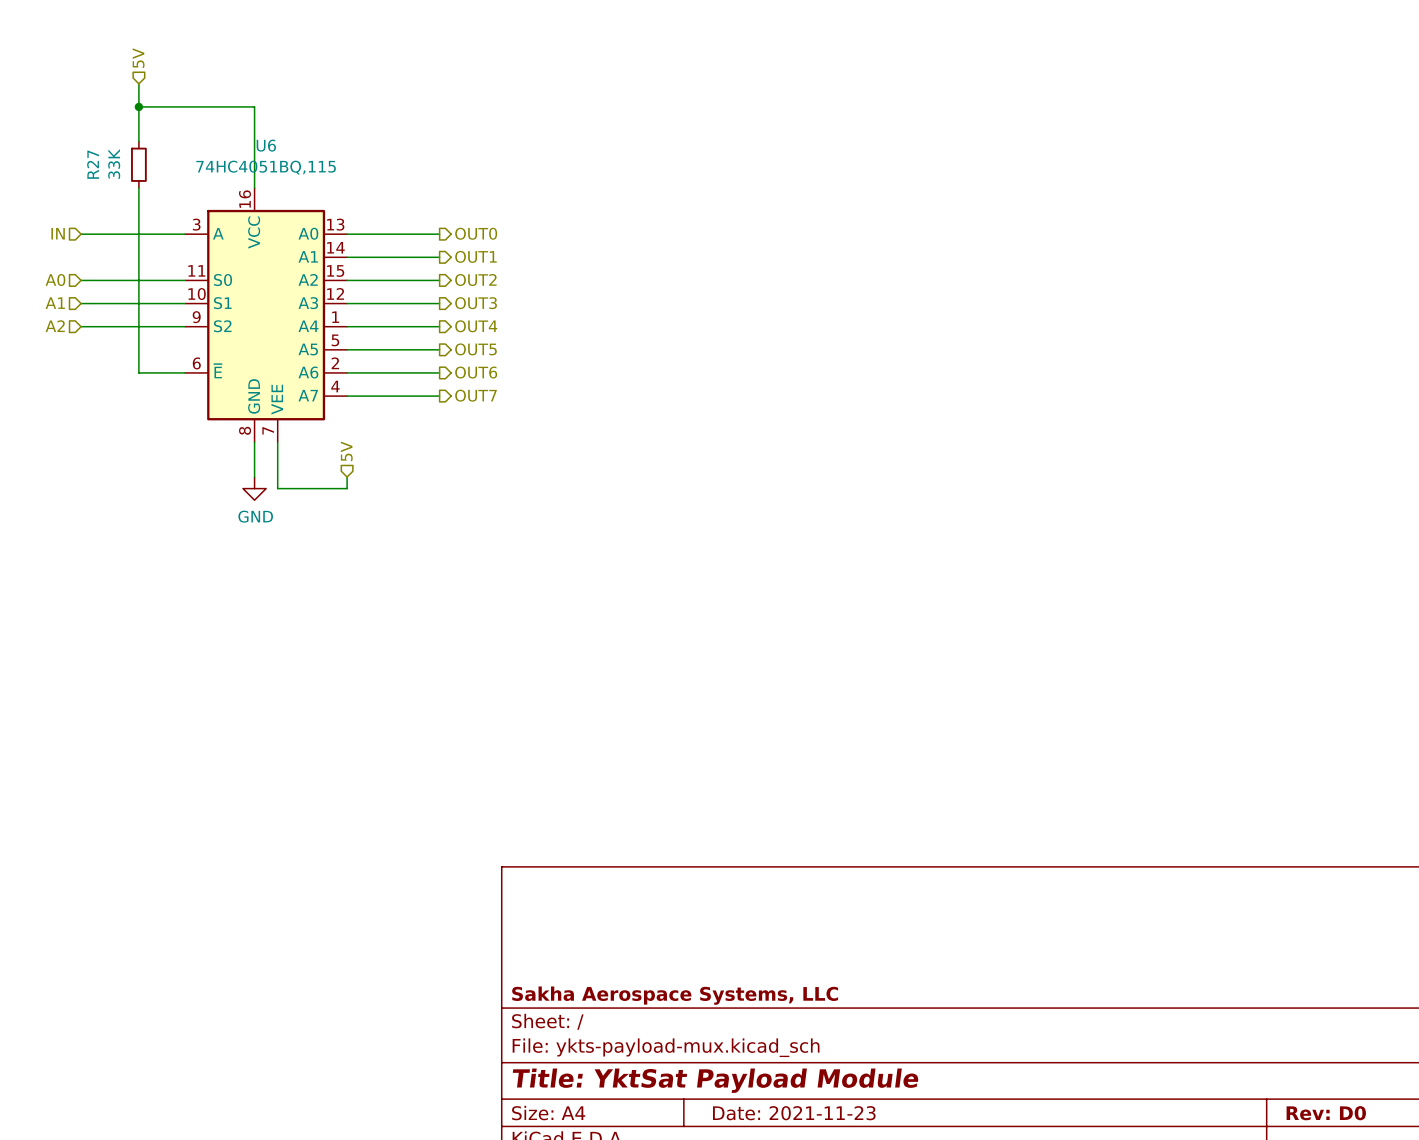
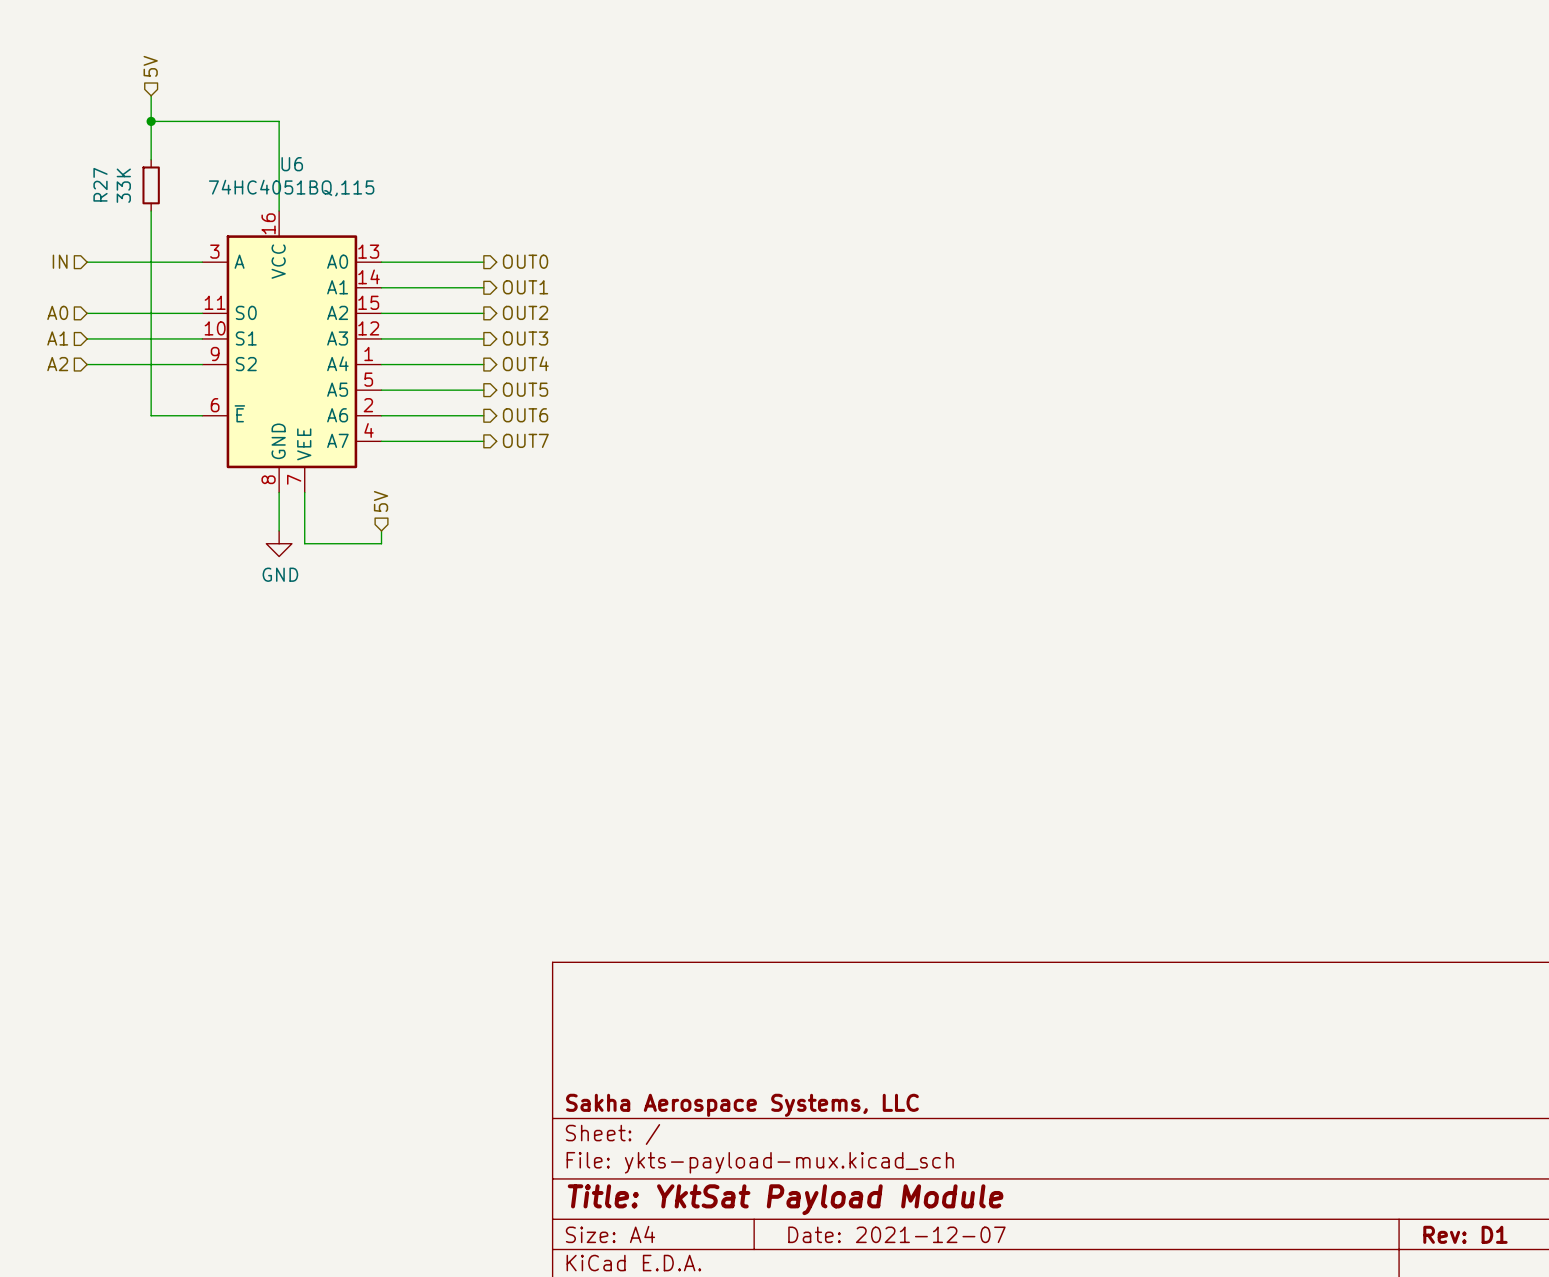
title block: Date: 2021-11-23 (794, 1113) -> Date: 2021-12-07 (896, 1234)
title block: Rev: D0 (1326, 1113) -> Rev: D1 (1465, 1234)

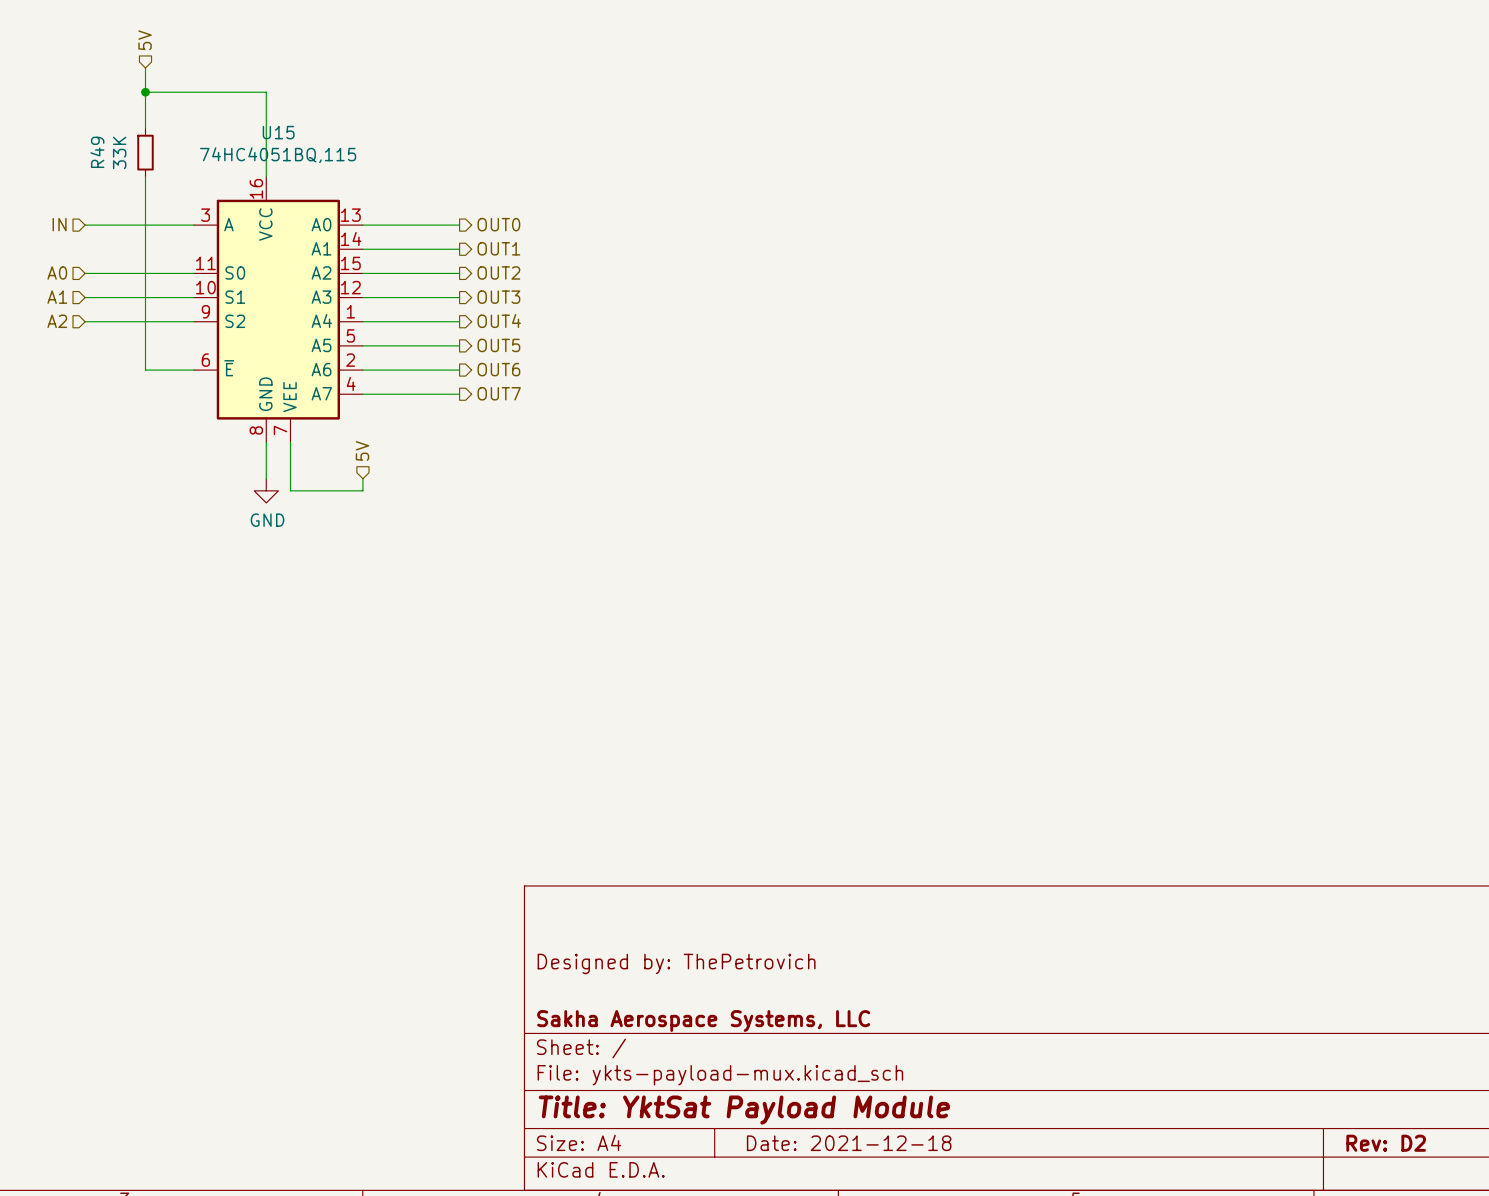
U6 name: U6 (292, 164) -> U15 (278, 132)
R27 name: R27 (100, 184) -> R49 (97, 152)
title block: none -> Designed by: ThePetrovich (676, 963)
title block: Date: 2021-12-07 (896, 1234) -> Date: 2021-12-18 (849, 1143)
title block: Rev: D1 (1465, 1234) -> Rev: D2 (1386, 1143)

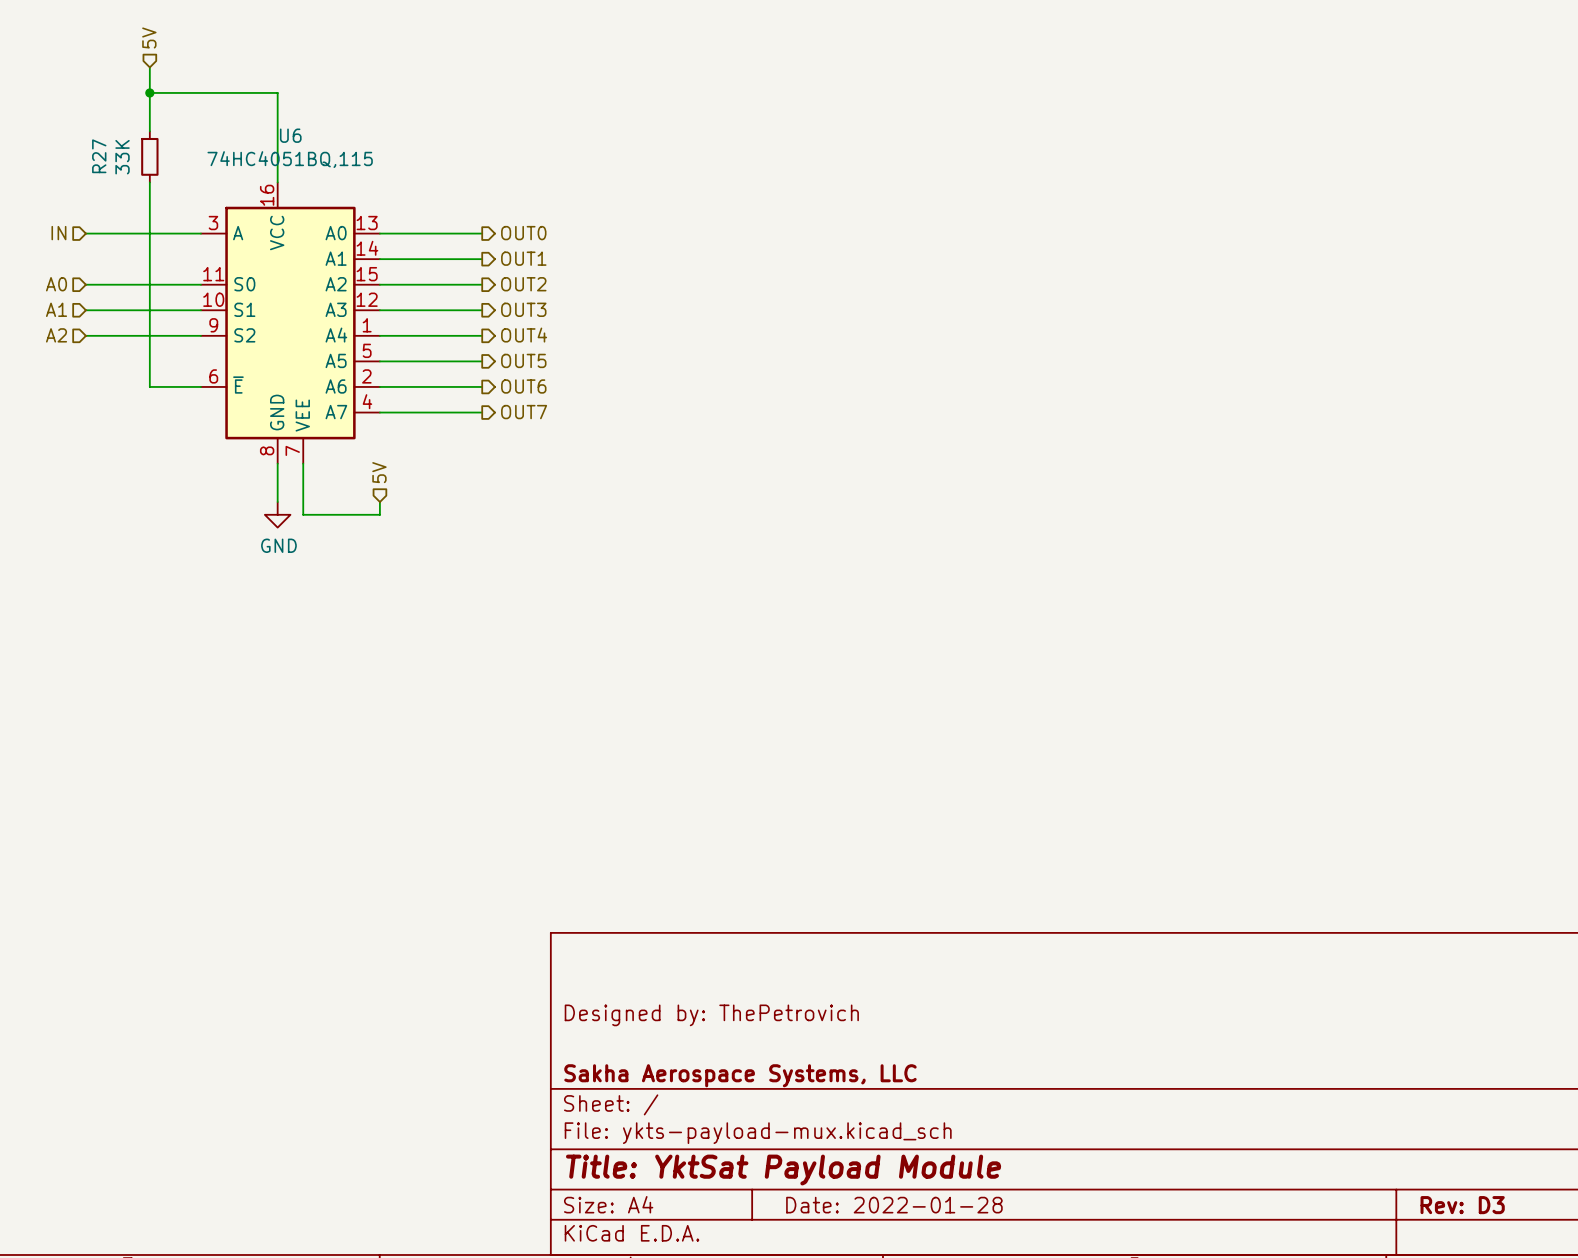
U15 name: U15 (278, 132) -> U6 (290, 135)
R49 name: R49 (97, 152) -> R27 (99, 156)
title block: Date: 2021-12-18 (849, 1143) -> Date: 2022-01-28 (894, 1205)
title block: Rev: D2 (1386, 1143) -> Rev: D3 (1462, 1205)

